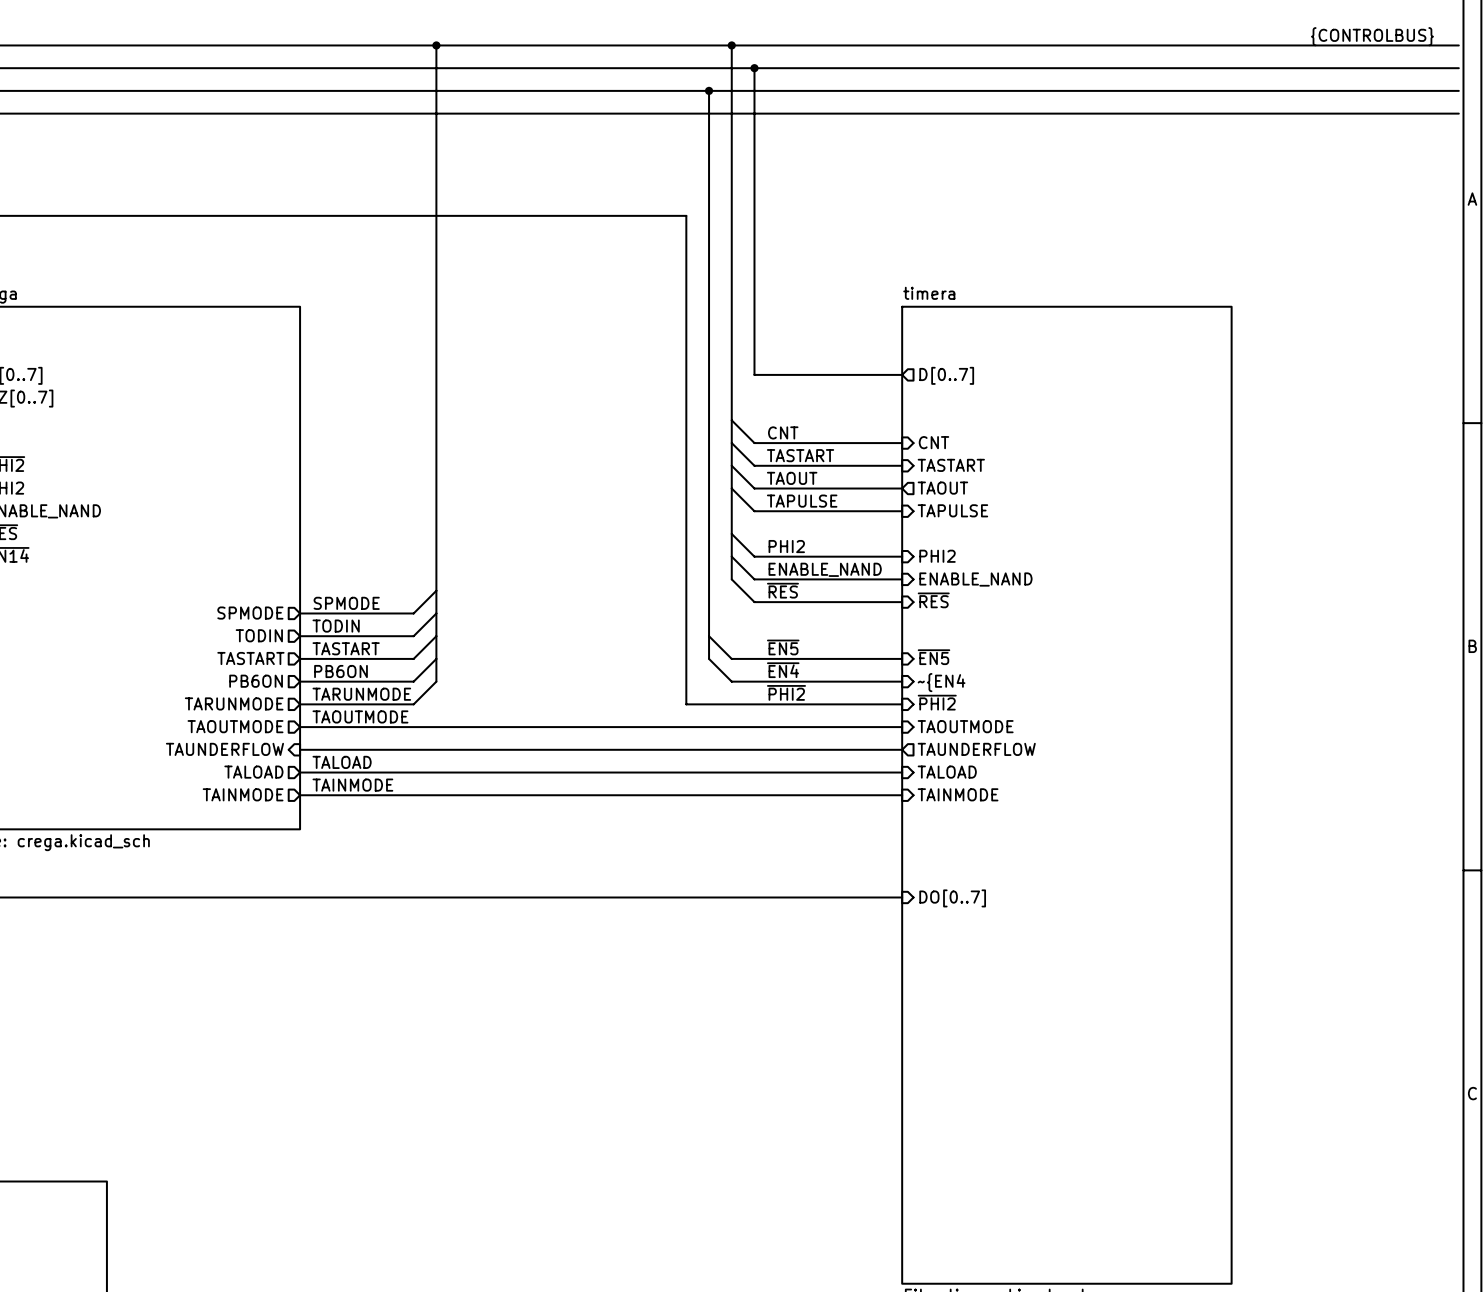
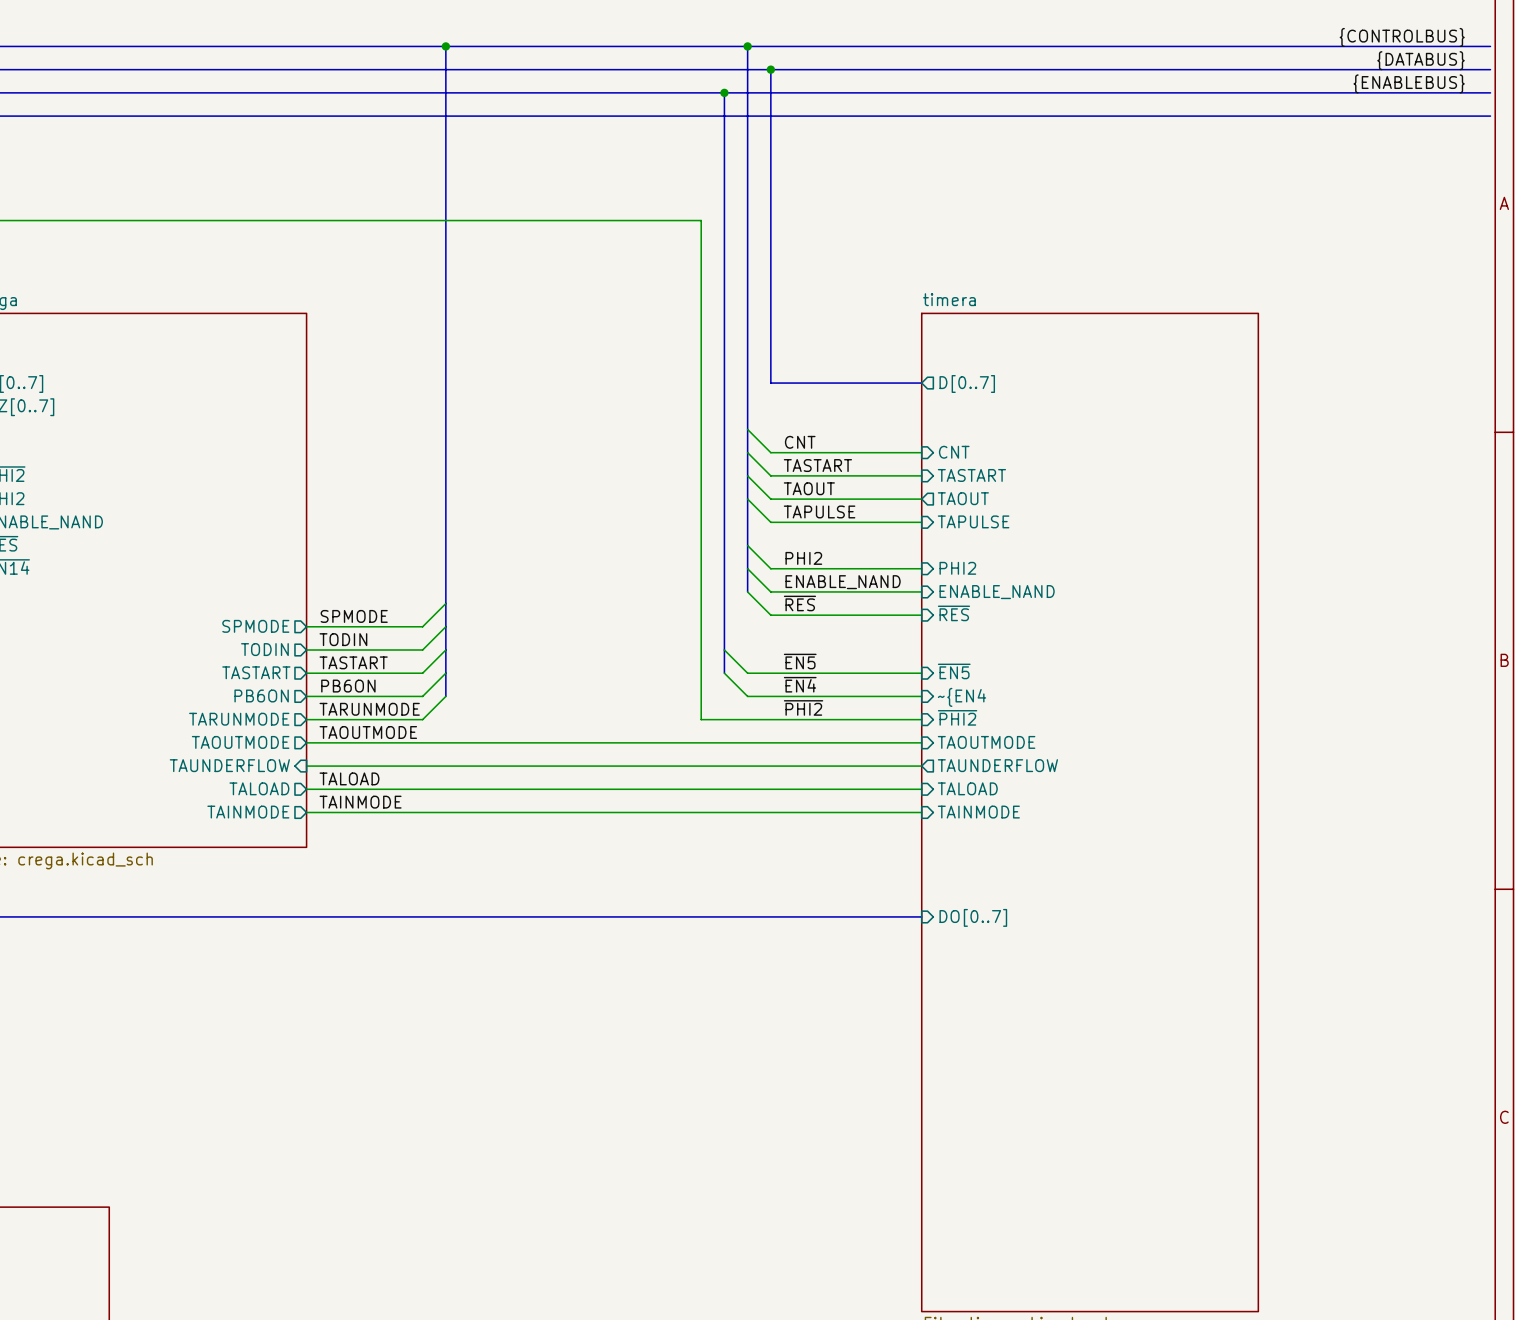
label: none -> {DATABUS} (1421, 60)
label: none -> {ENABLEBUS} (1409, 83)

